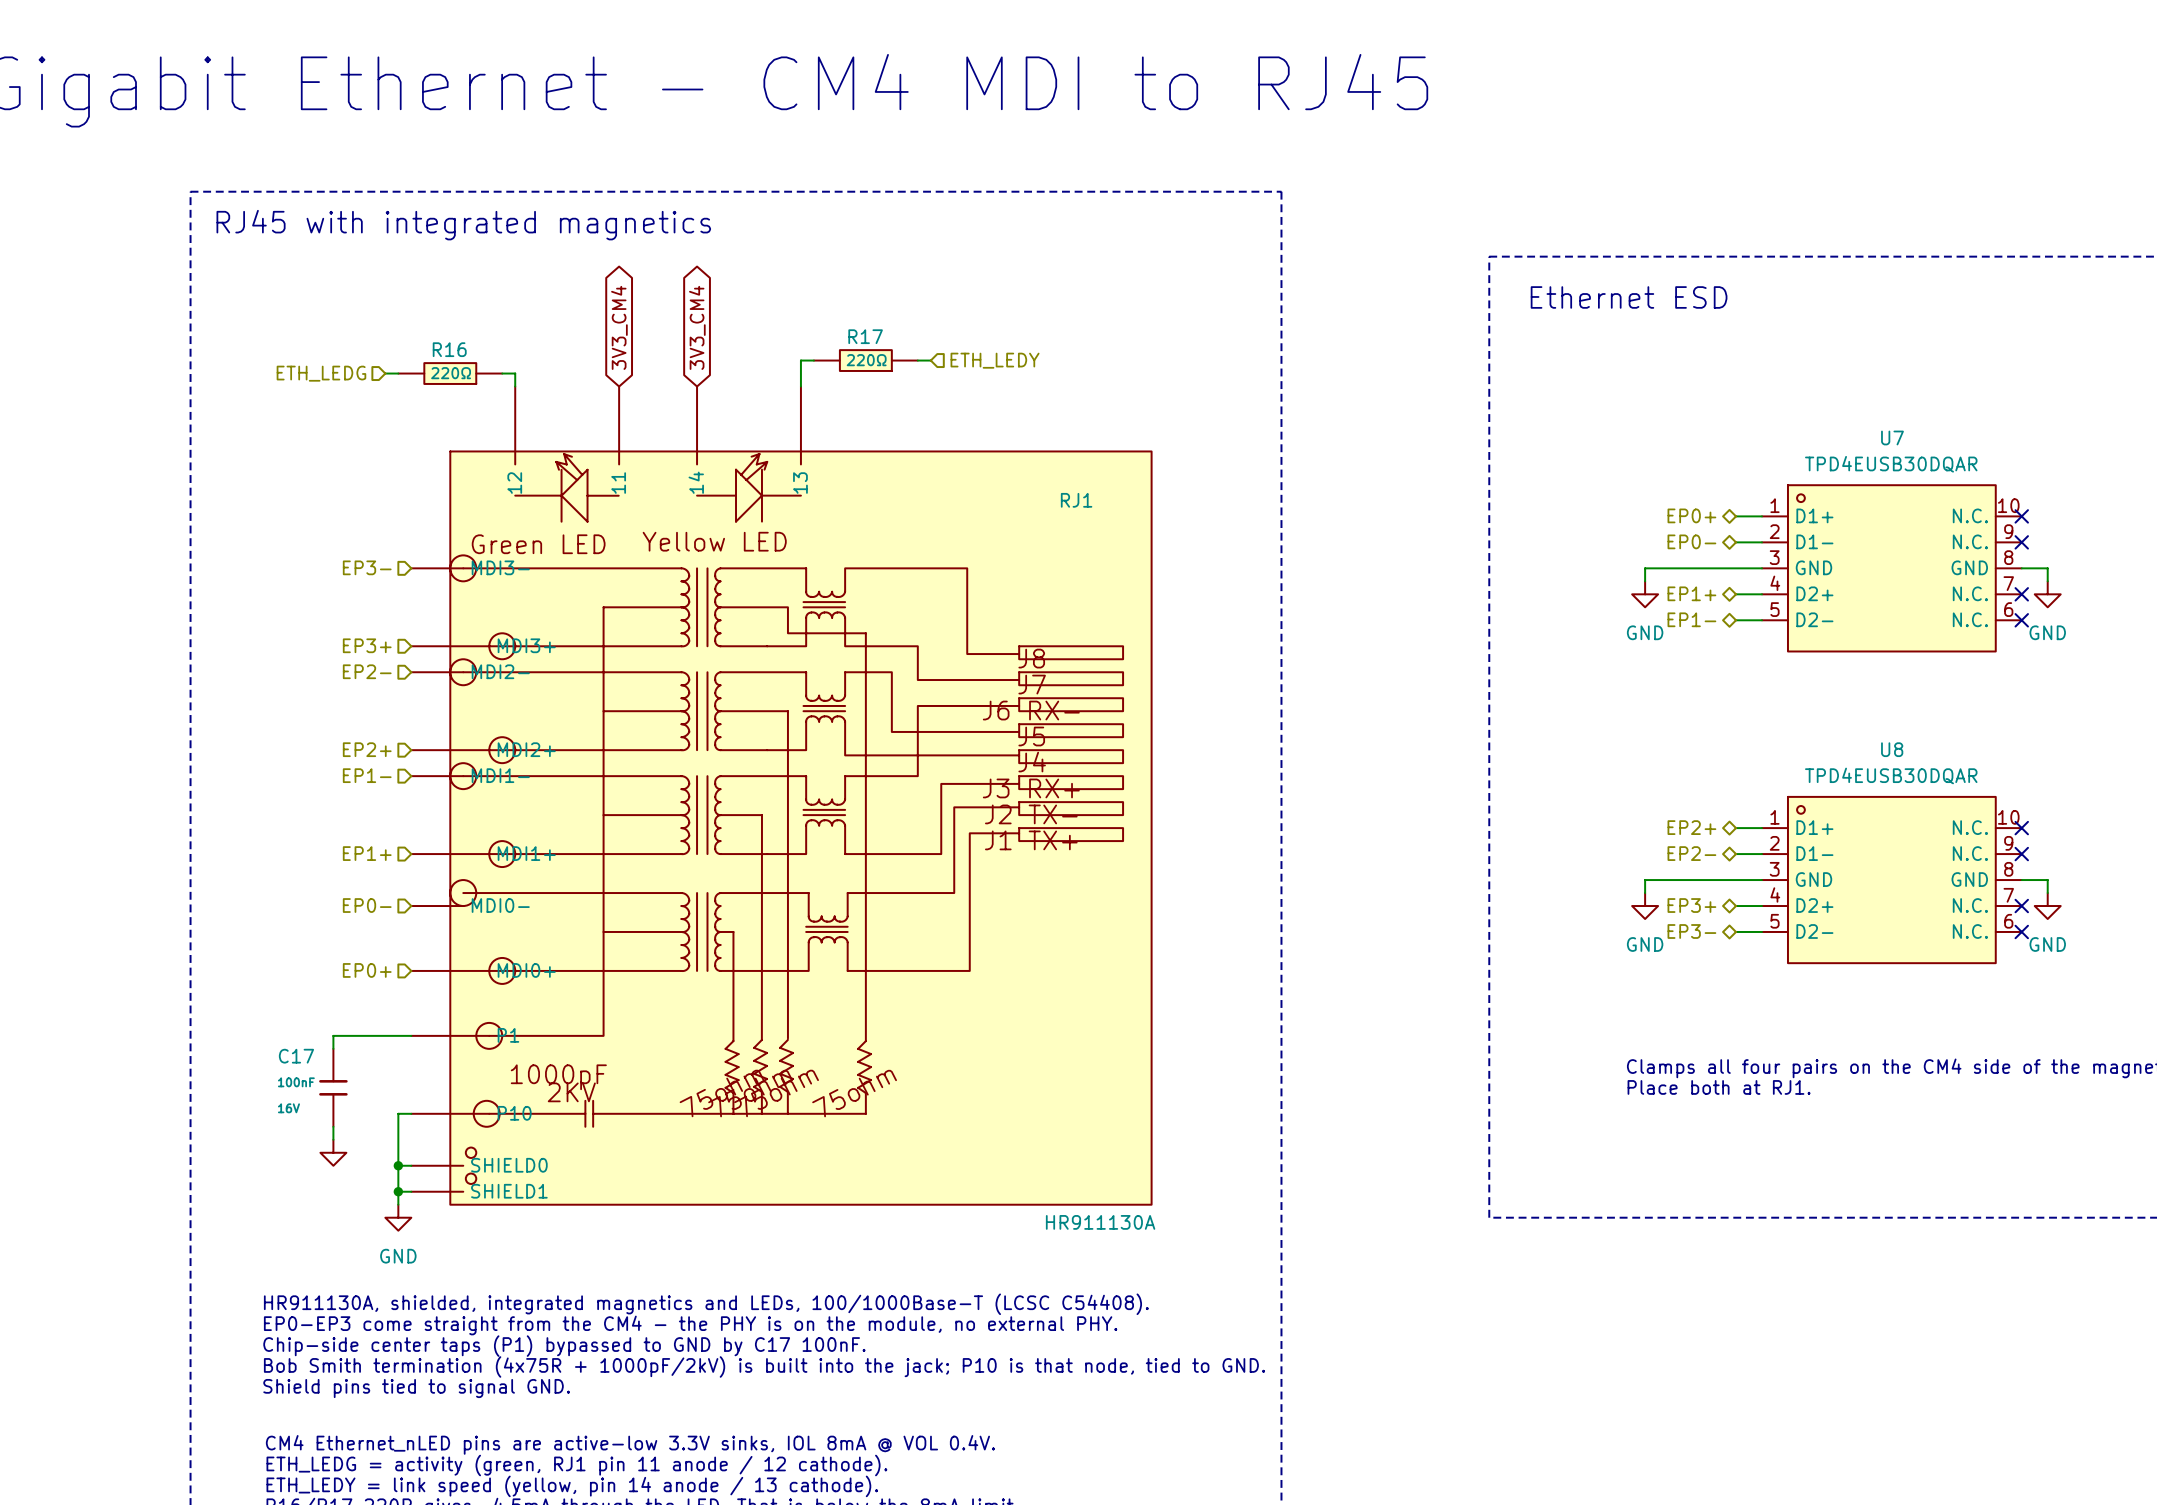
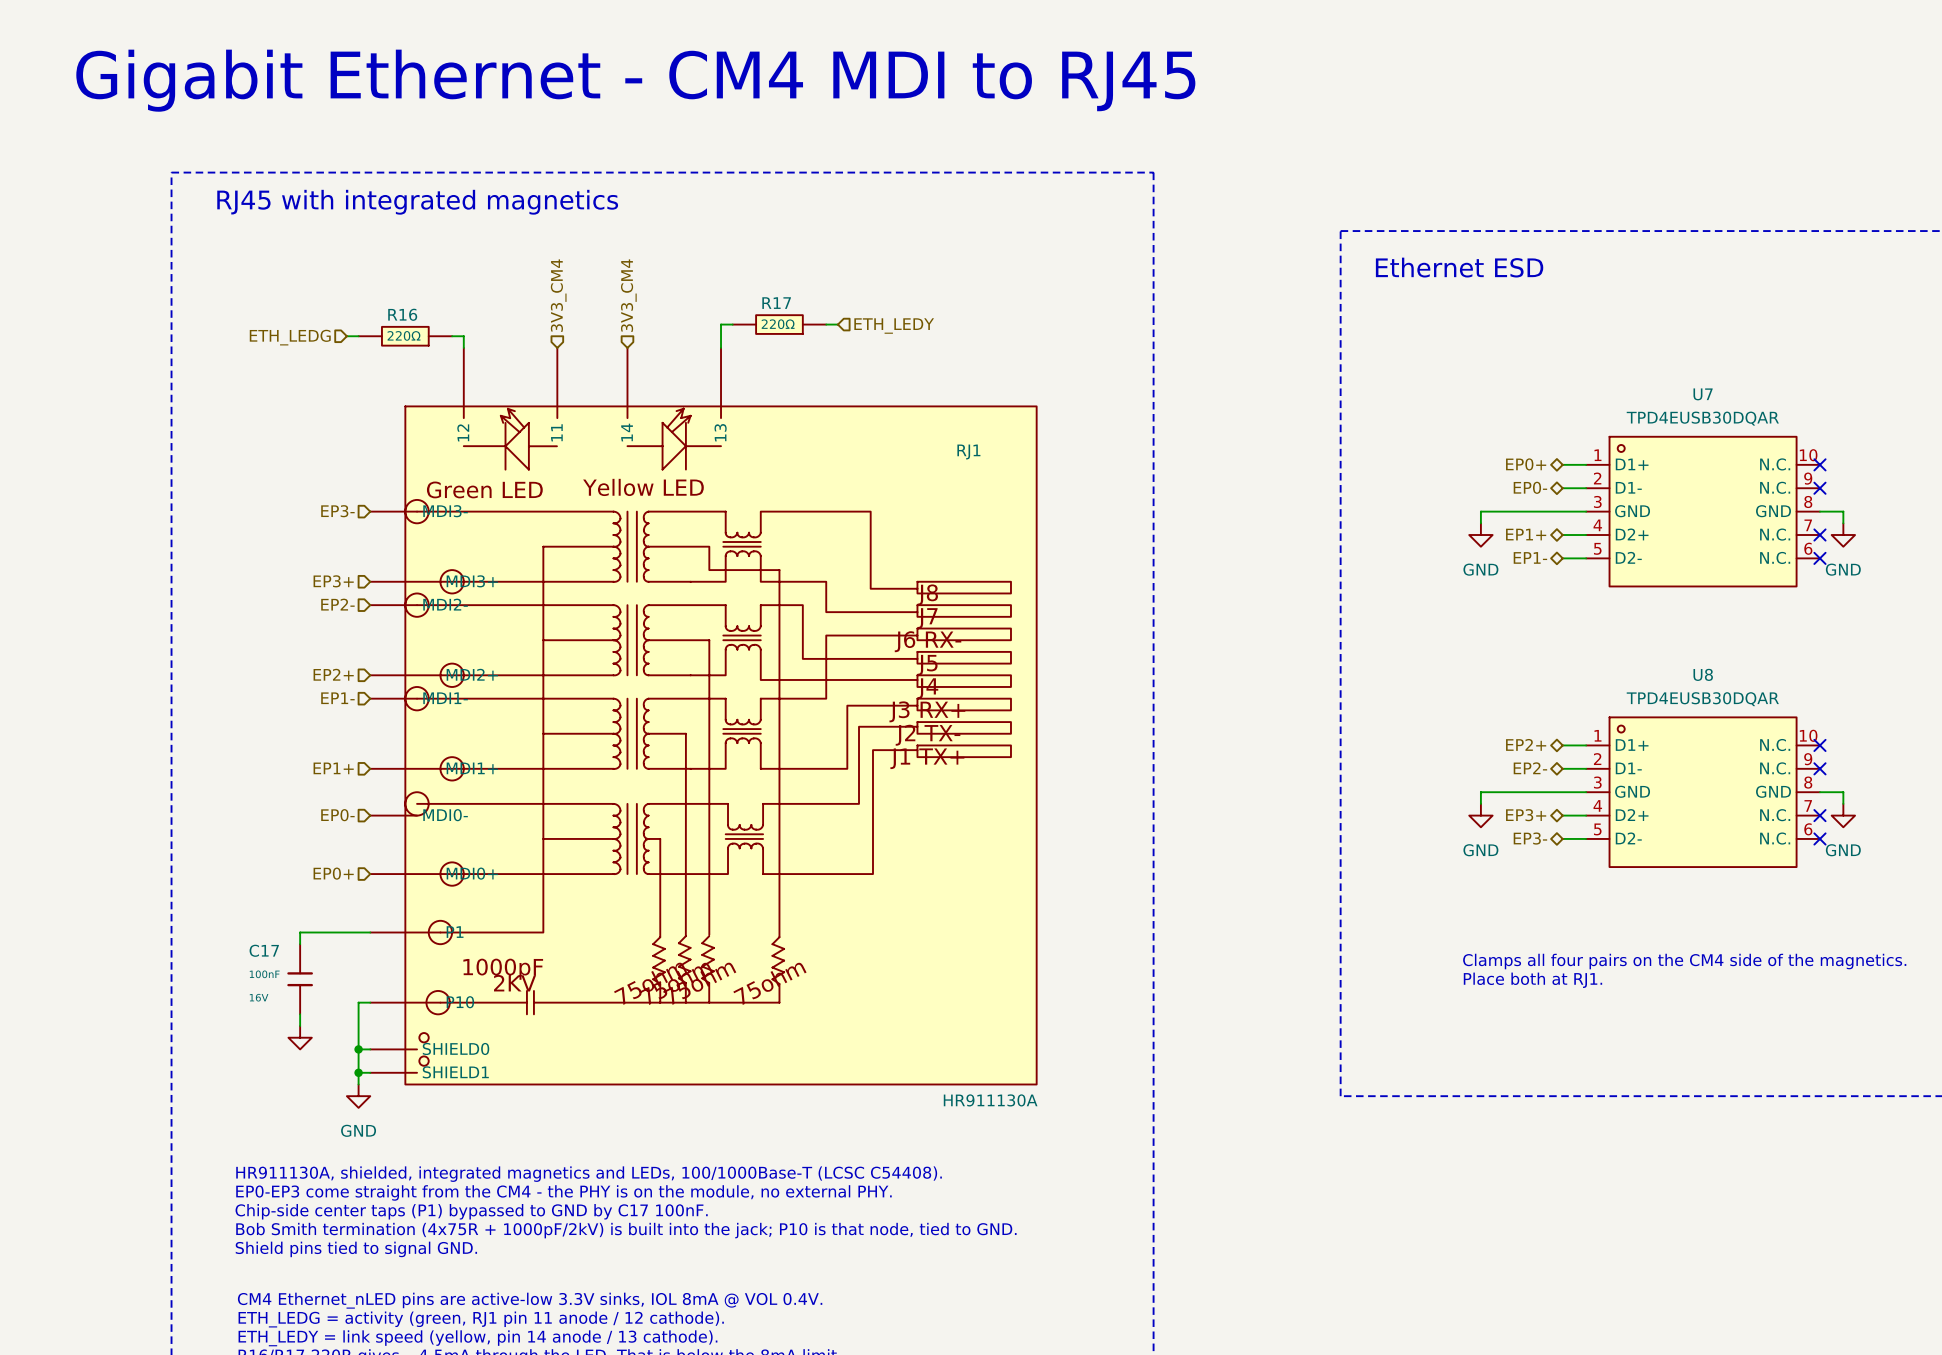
hierarchical label: none -> 3V3_CM4 (558, 295)
hierarchical label: none -> 3V3_CM4 (628, 295)
global label: 3V3_CM4 (619, 327) -> none
global label: 3V3_CM4 (697, 327) -> none

